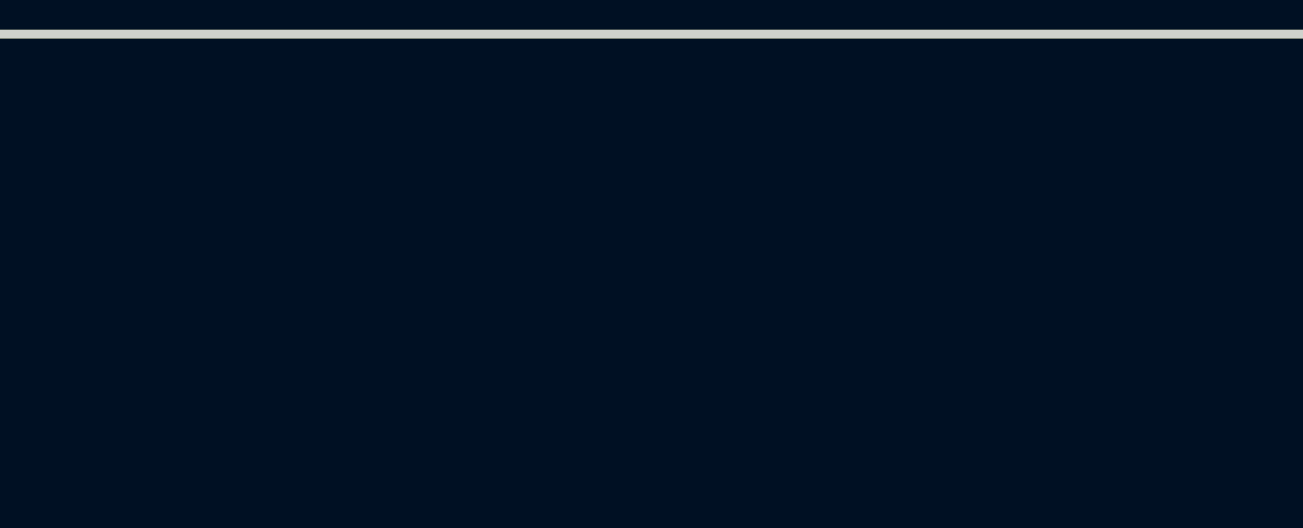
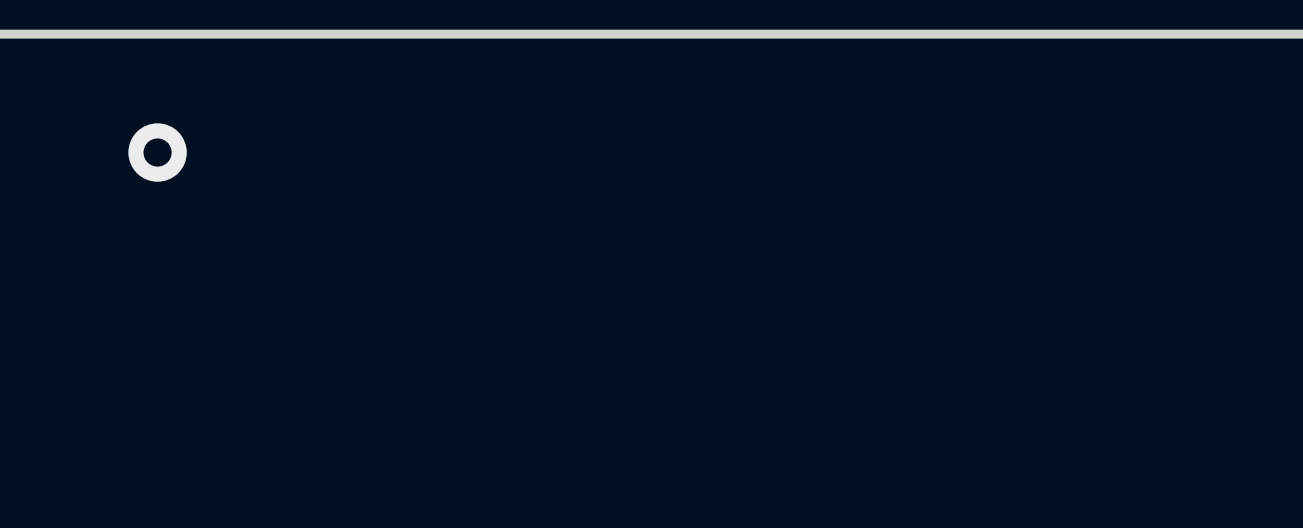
via: none -> (157, 152)

